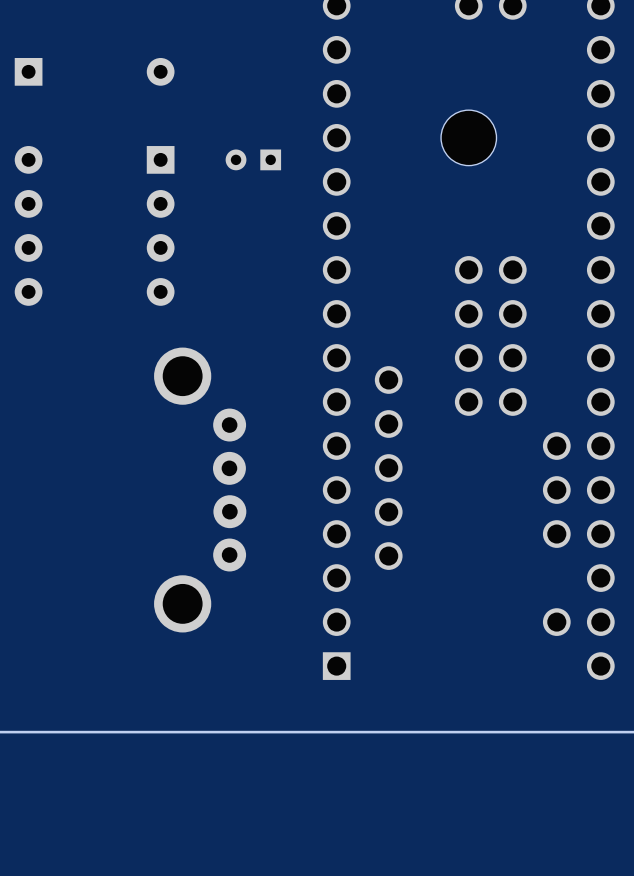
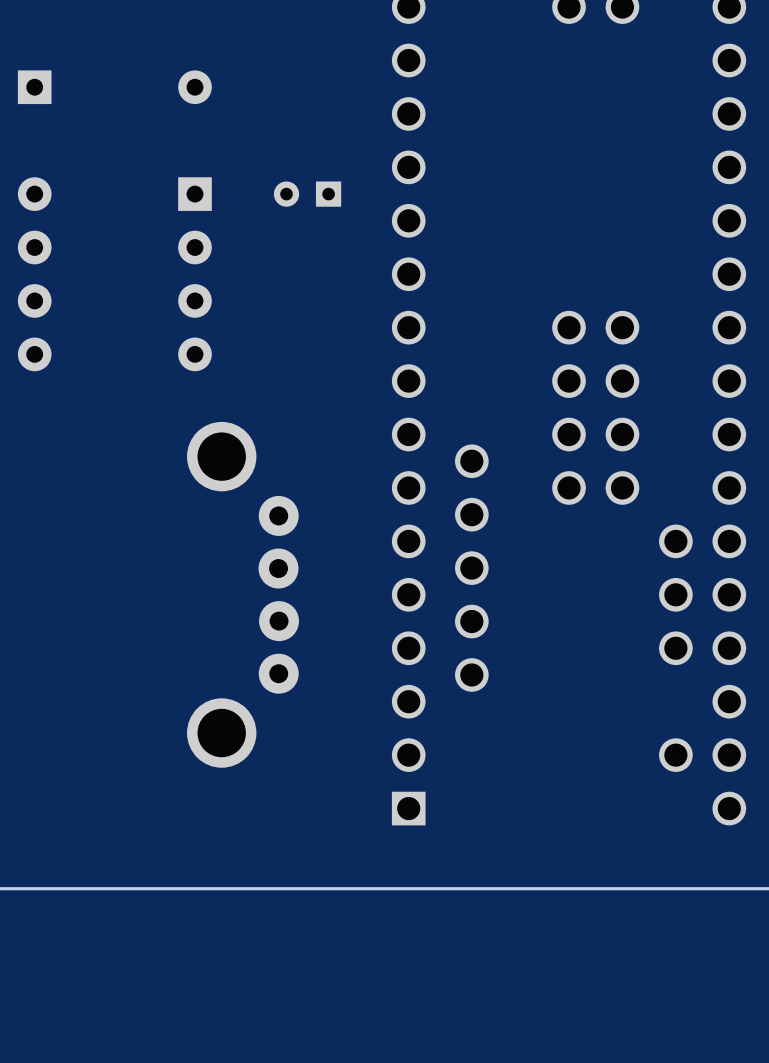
part: (468, 137) -> none

